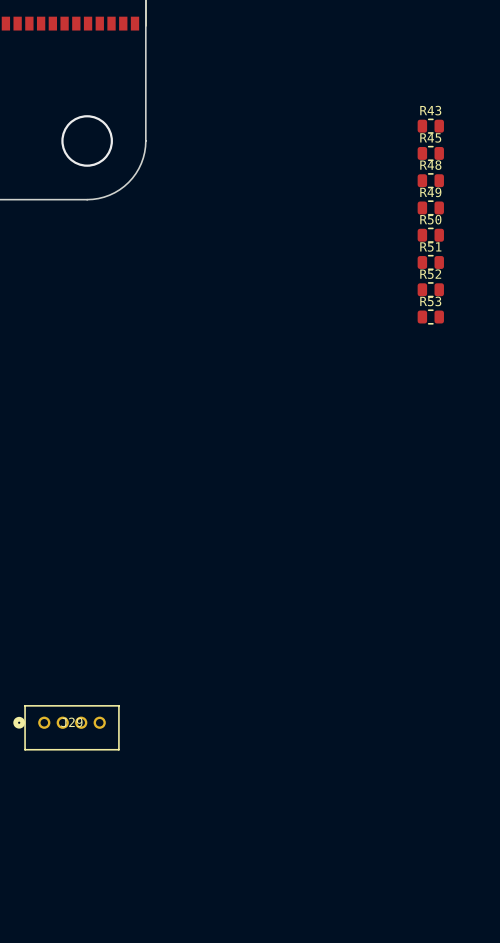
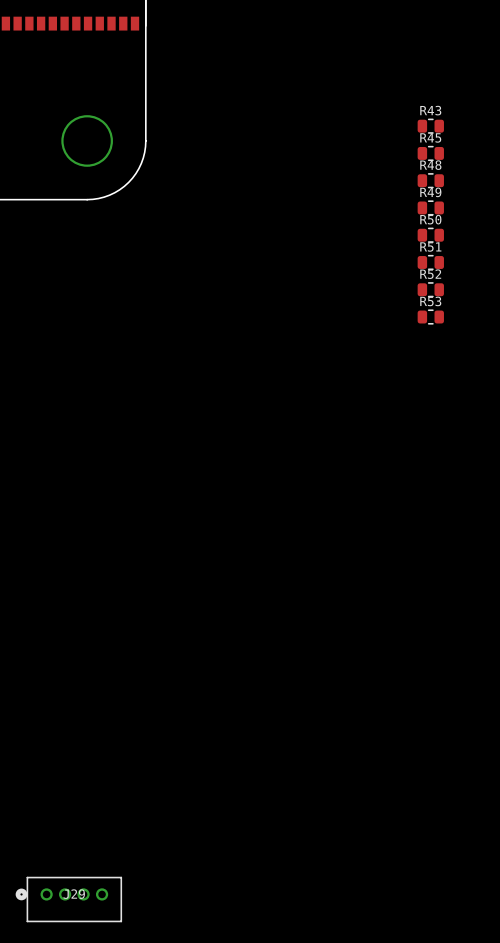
J29 position: (66, 727) -> (68, 899)

